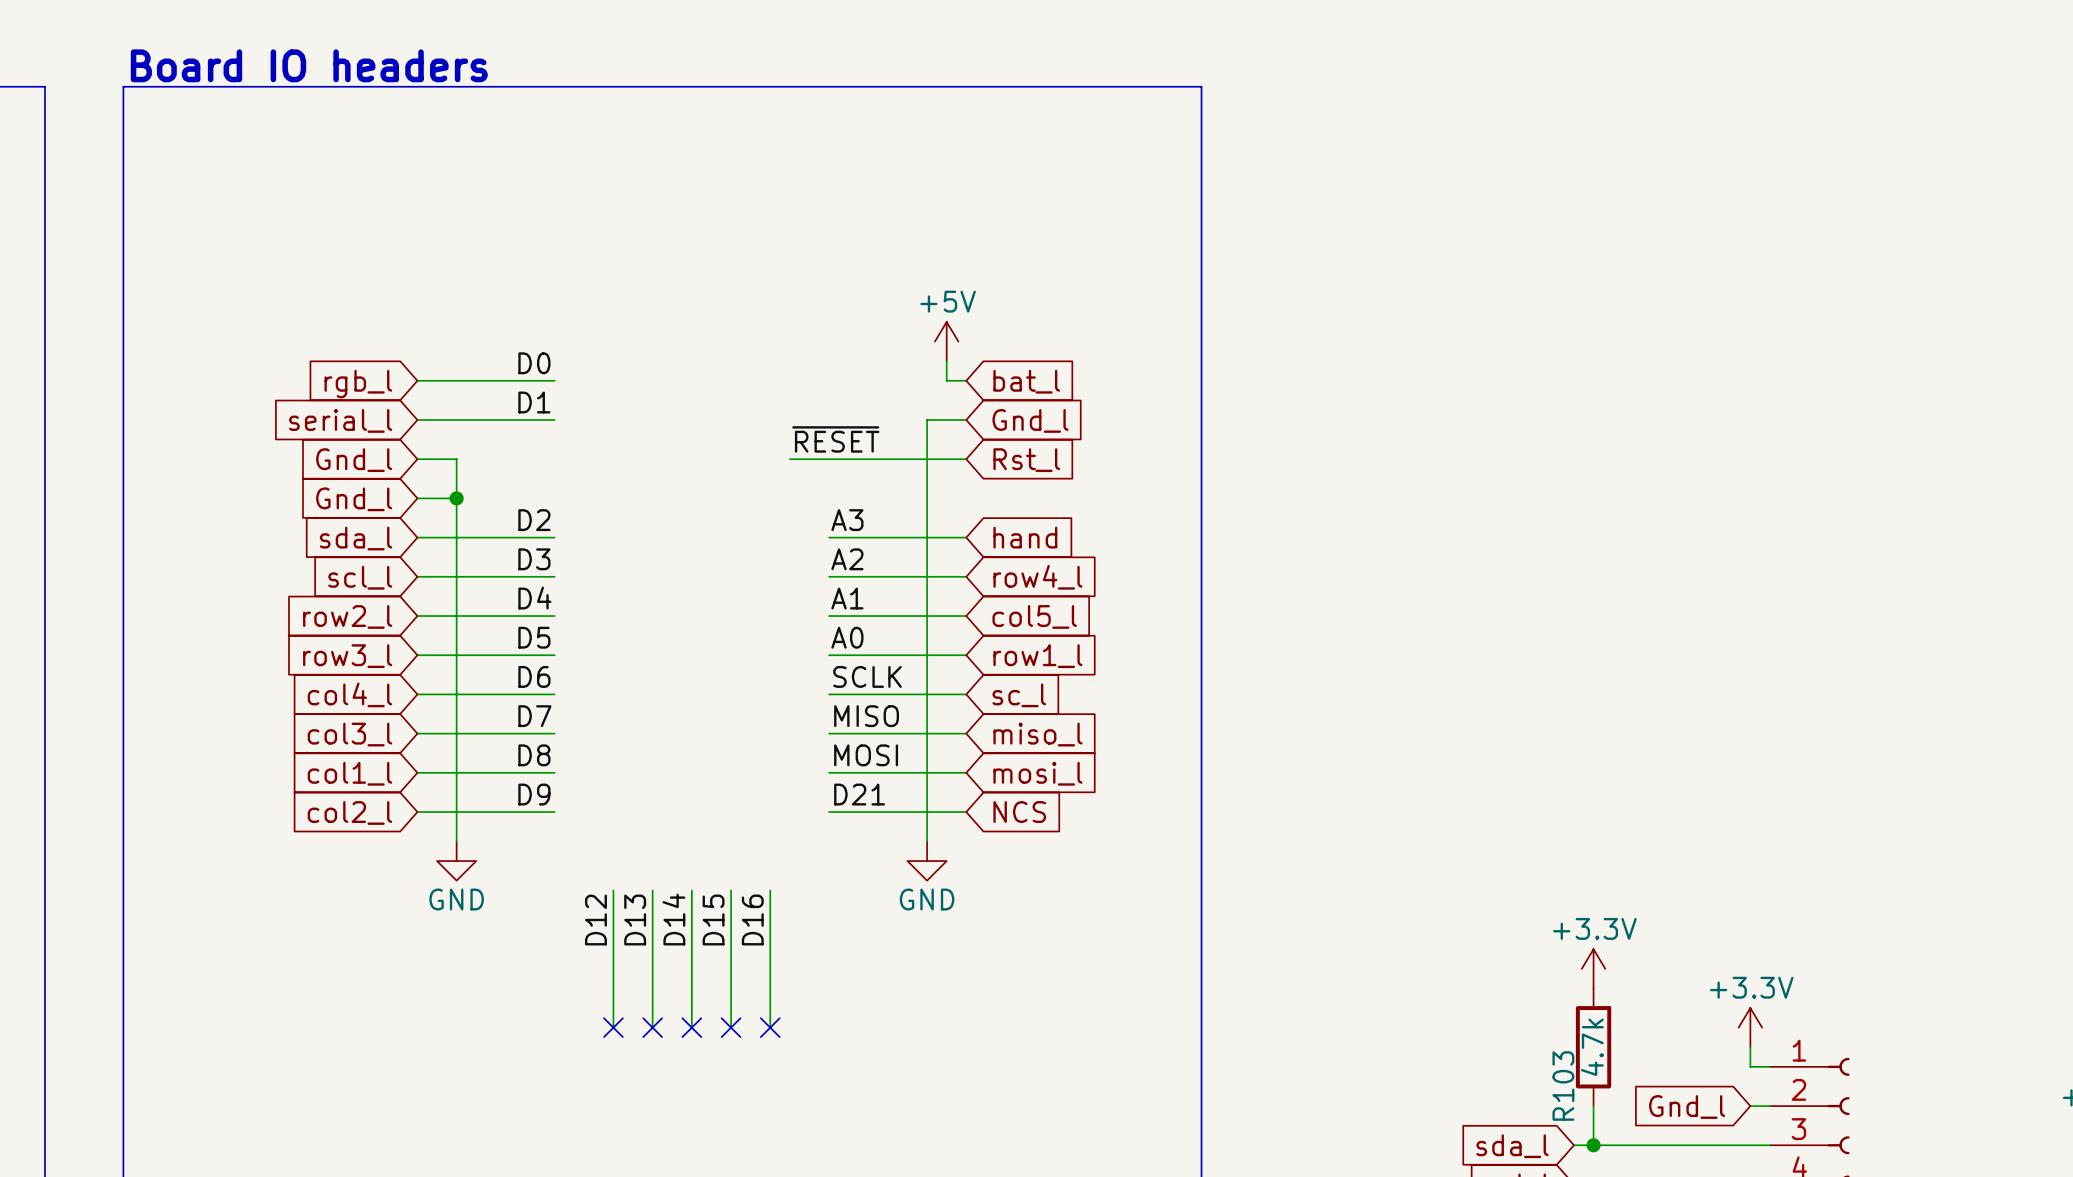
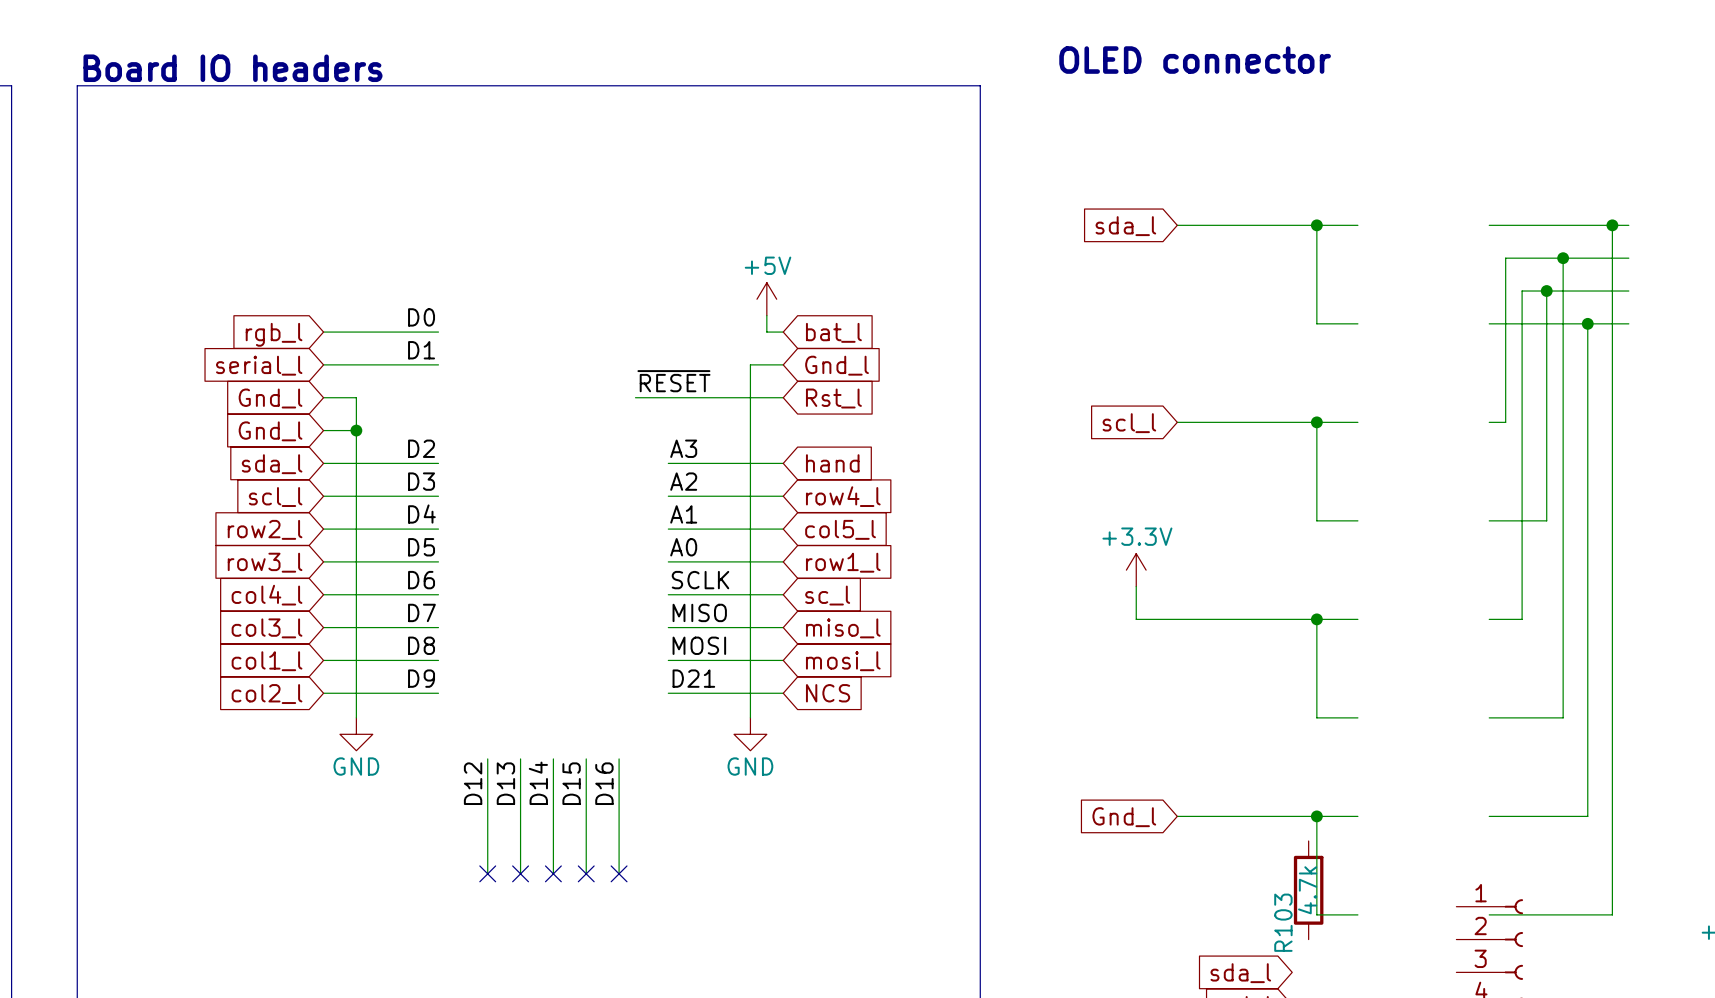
text: none -> OLED connector (1195, 60)
wire: none -> (1177, 225) (1357, 225)
wire: none -> (1316, 225) (1316, 323) (1357, 323)
junction: none -> (1316, 225)
wire: none -> (1489, 225) (1628, 225)
wire: none -> (1612, 225) (1612, 914) (1489, 914)
junction: none -> (1612, 225)
global label: none -> sda_l (1125, 226)
wire: none -> (1563, 258) (1563, 717) (1489, 717)
junction: none -> (1563, 258)
wire: none -> (1628, 258) (1505, 258) (1505, 422) (1489, 422)
wire: none -> (1546, 291) (1546, 520) (1489, 520)
junction: none -> (1546, 291)
wire: none -> (1628, 291) (1522, 291) (1522, 619) (1489, 619)
wire: none -> (1489, 323) (1628, 323)
wire: none -> (1587, 323) (1587, 816) (1489, 816)
junction: none -> (1587, 323)
wire: none -> (1177, 422) (1357, 422)
wire: none -> (1316, 422) (1316, 520) (1357, 520)
junction: none -> (1316, 422)
global label: none -> scl_l (1129, 423)
power symbol: none -> +3.3V (1136, 570)
wire: none -> (1136, 586) (1136, 619) (1357, 619)
wire: none -> (1316, 619) (1316, 717) (1357, 717)
junction: none -> (1316, 619)
global label: none -> Gnd_l (1124, 817)
wire: none -> (1177, 816) (1357, 816)
wire: none -> (1316, 816) (1316, 914) (1357, 914)
junction: none -> (1316, 816)
power symbol: +3.3V (1593, 968) -> none
power symbol: +3.3V (1750, 1027) -> none
wire: (1750, 1047) (1750, 1066) (1769, 1066) -> none
wire: (1593, 1106) (1593, 1145) -> none
wire: (1750, 1106) (1769, 1106) -> none
global label: Gnd_l (1687, 1107) -> none
wire: (1573, 1145) (1769, 1145) -> none
junction: (1593, 1145) -> none

